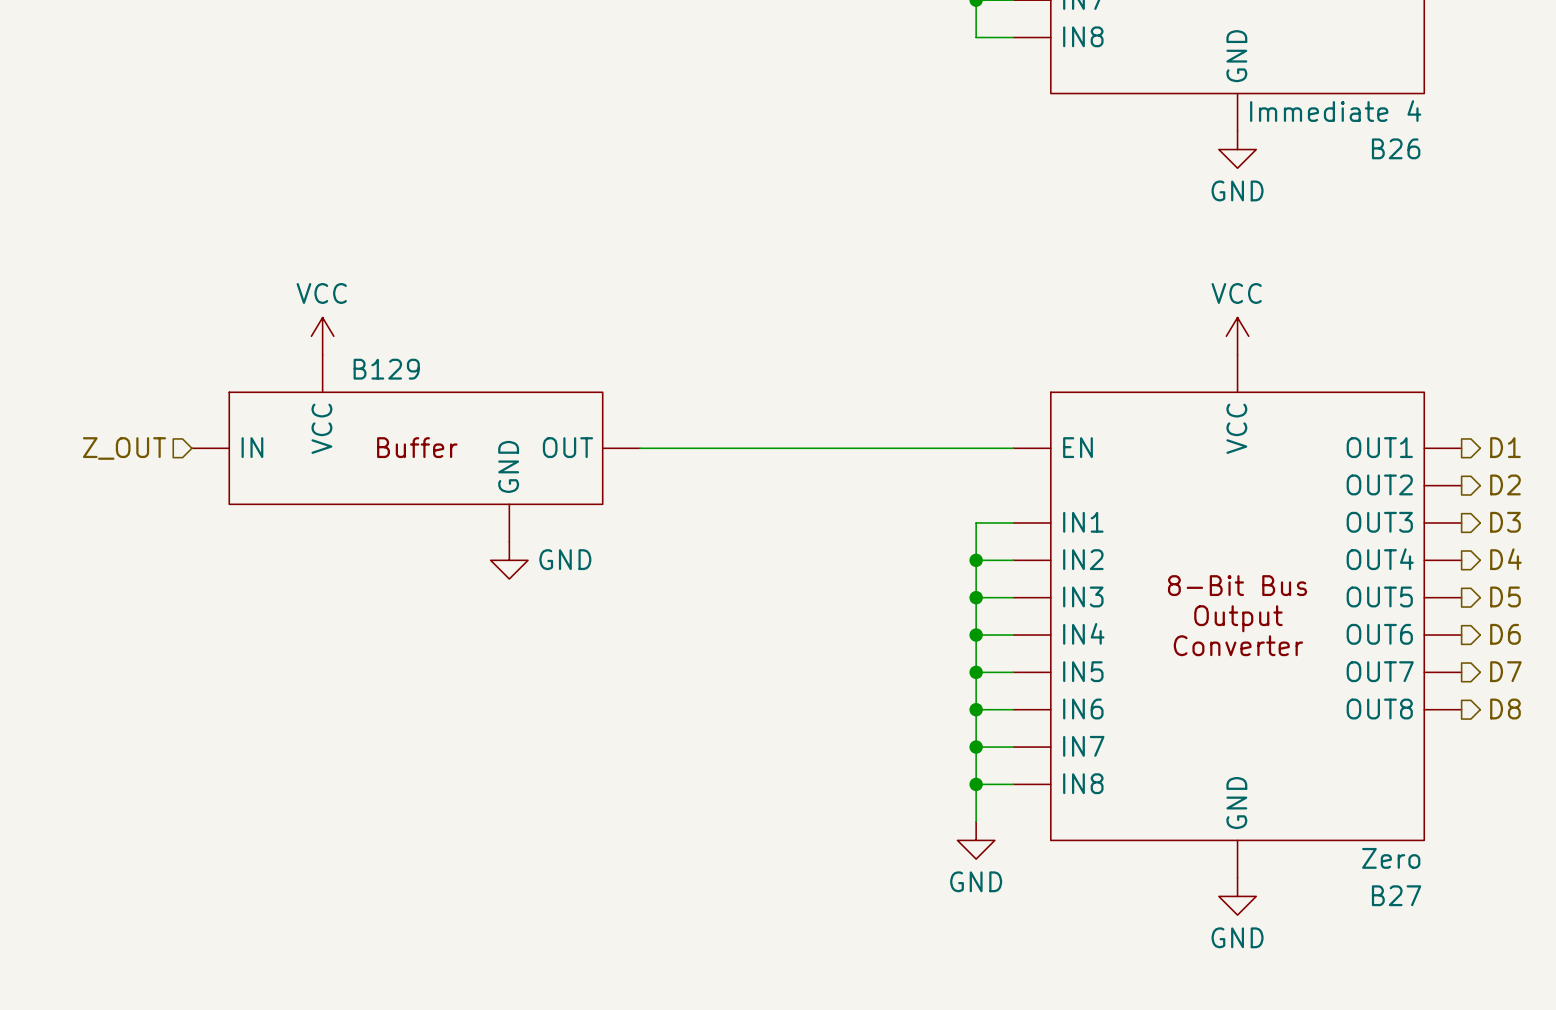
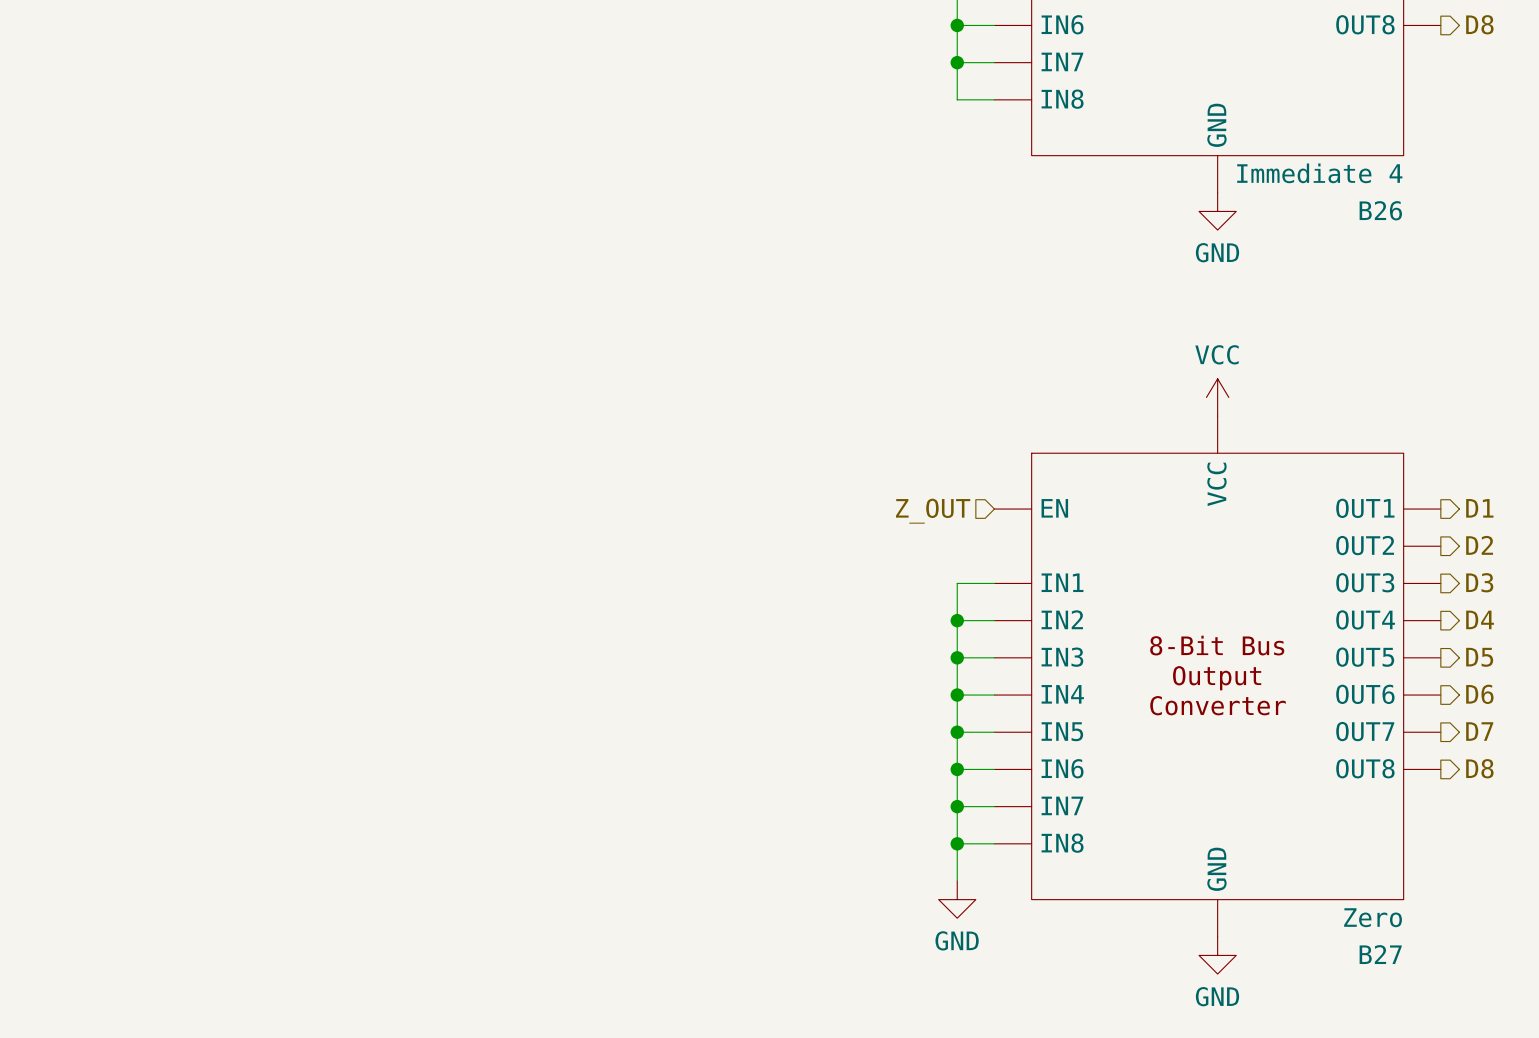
power symbol: VCC (322, 336) -> none
hierarchical label: Z_OUT (124, 448) -> none
B129: (415, 448) -> none
wire: (640, 448) (1013, 448) -> none
hierarchical label: none -> Z_OUT (933, 511)
power symbol: GND (509, 560) -> none

